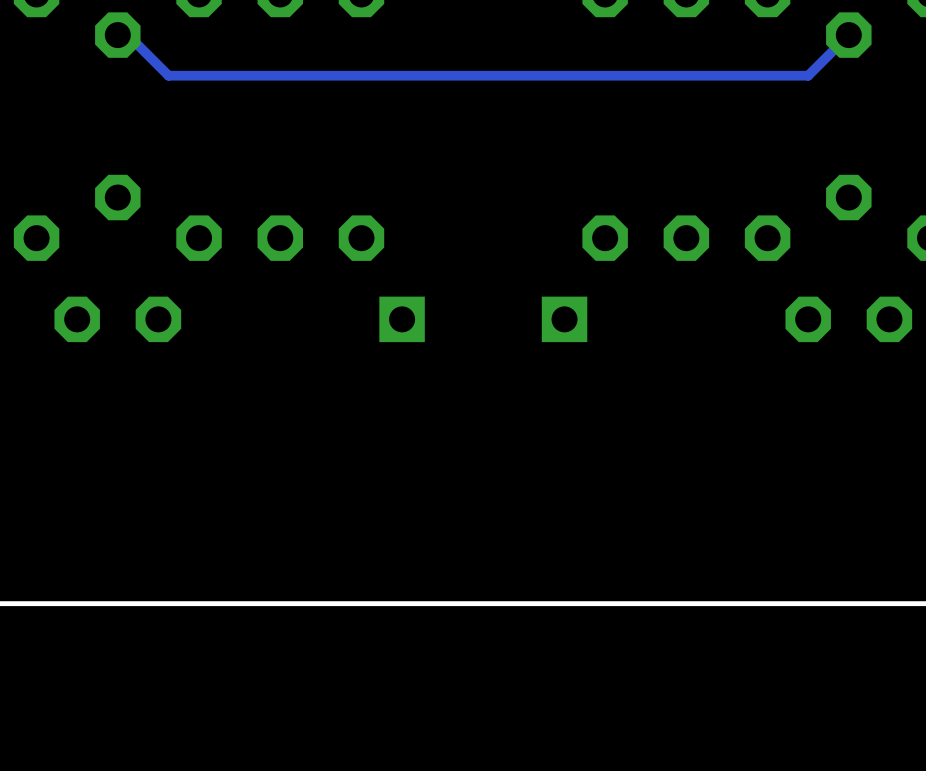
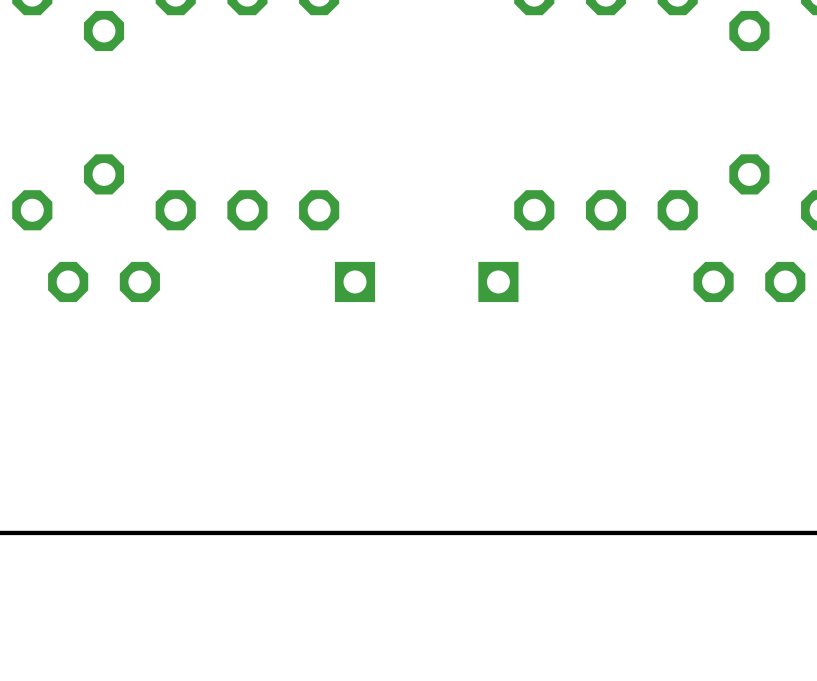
track: (848, 35) (808, 75) (168, 75) (127, 35) (117, 35) -> none

